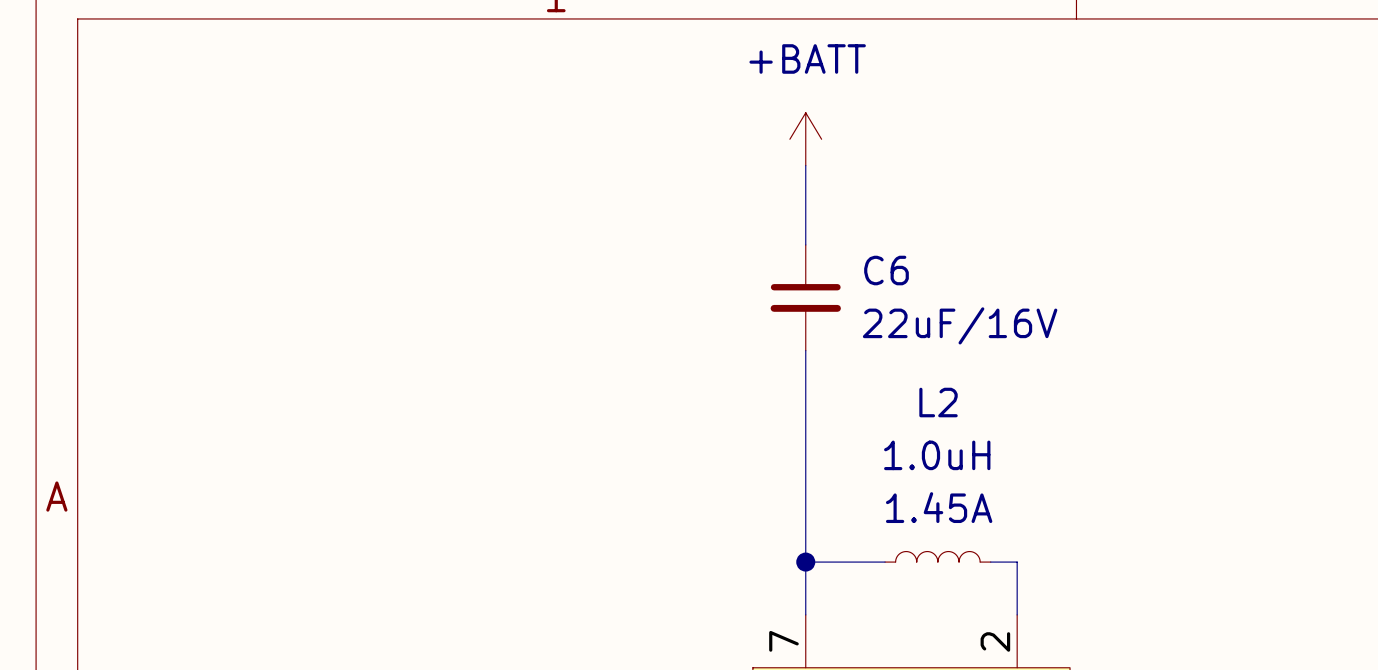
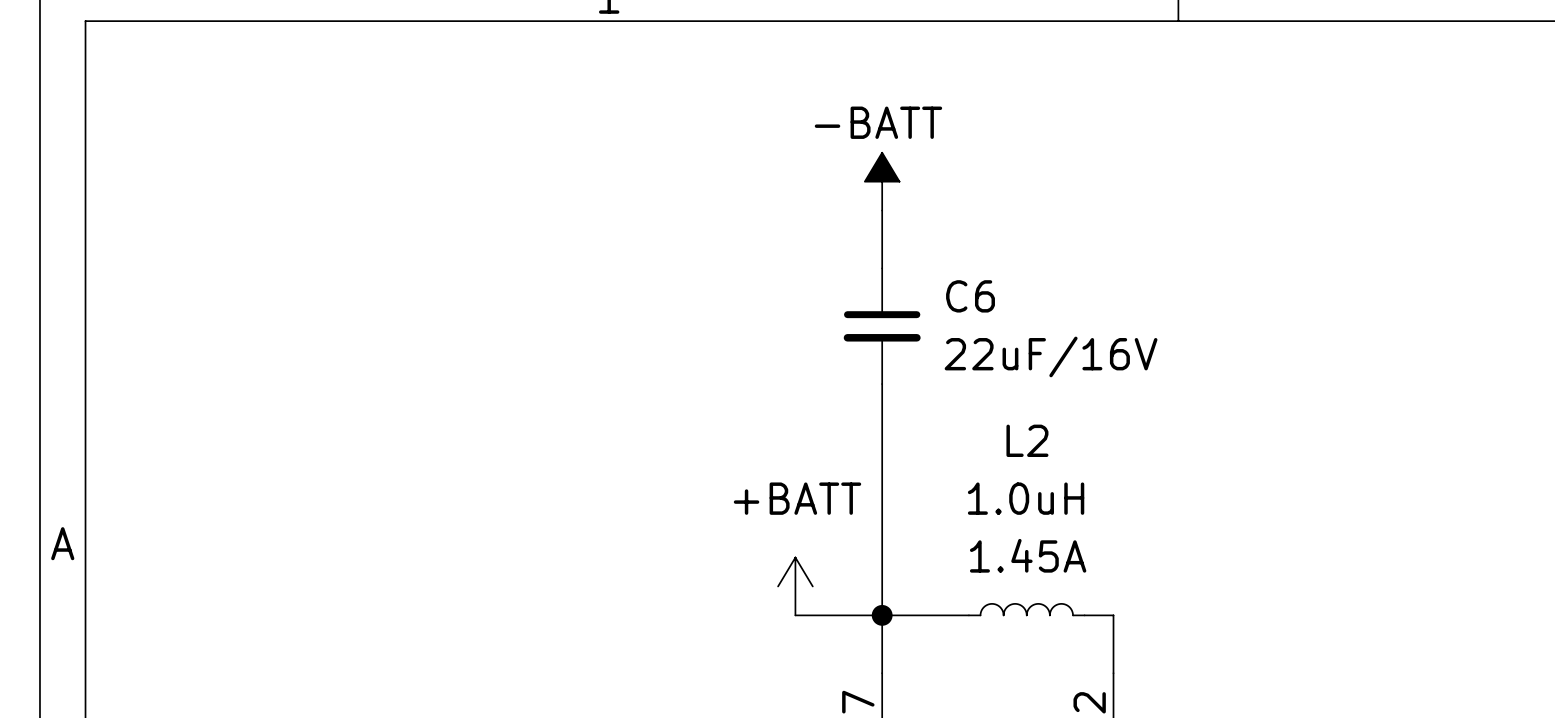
power symbol position: +BATT (805, 139) -> +BATT (795, 586)
power symbol: none -> -BATT (882, 181)
wire: none -> (795, 615) (882, 615)

